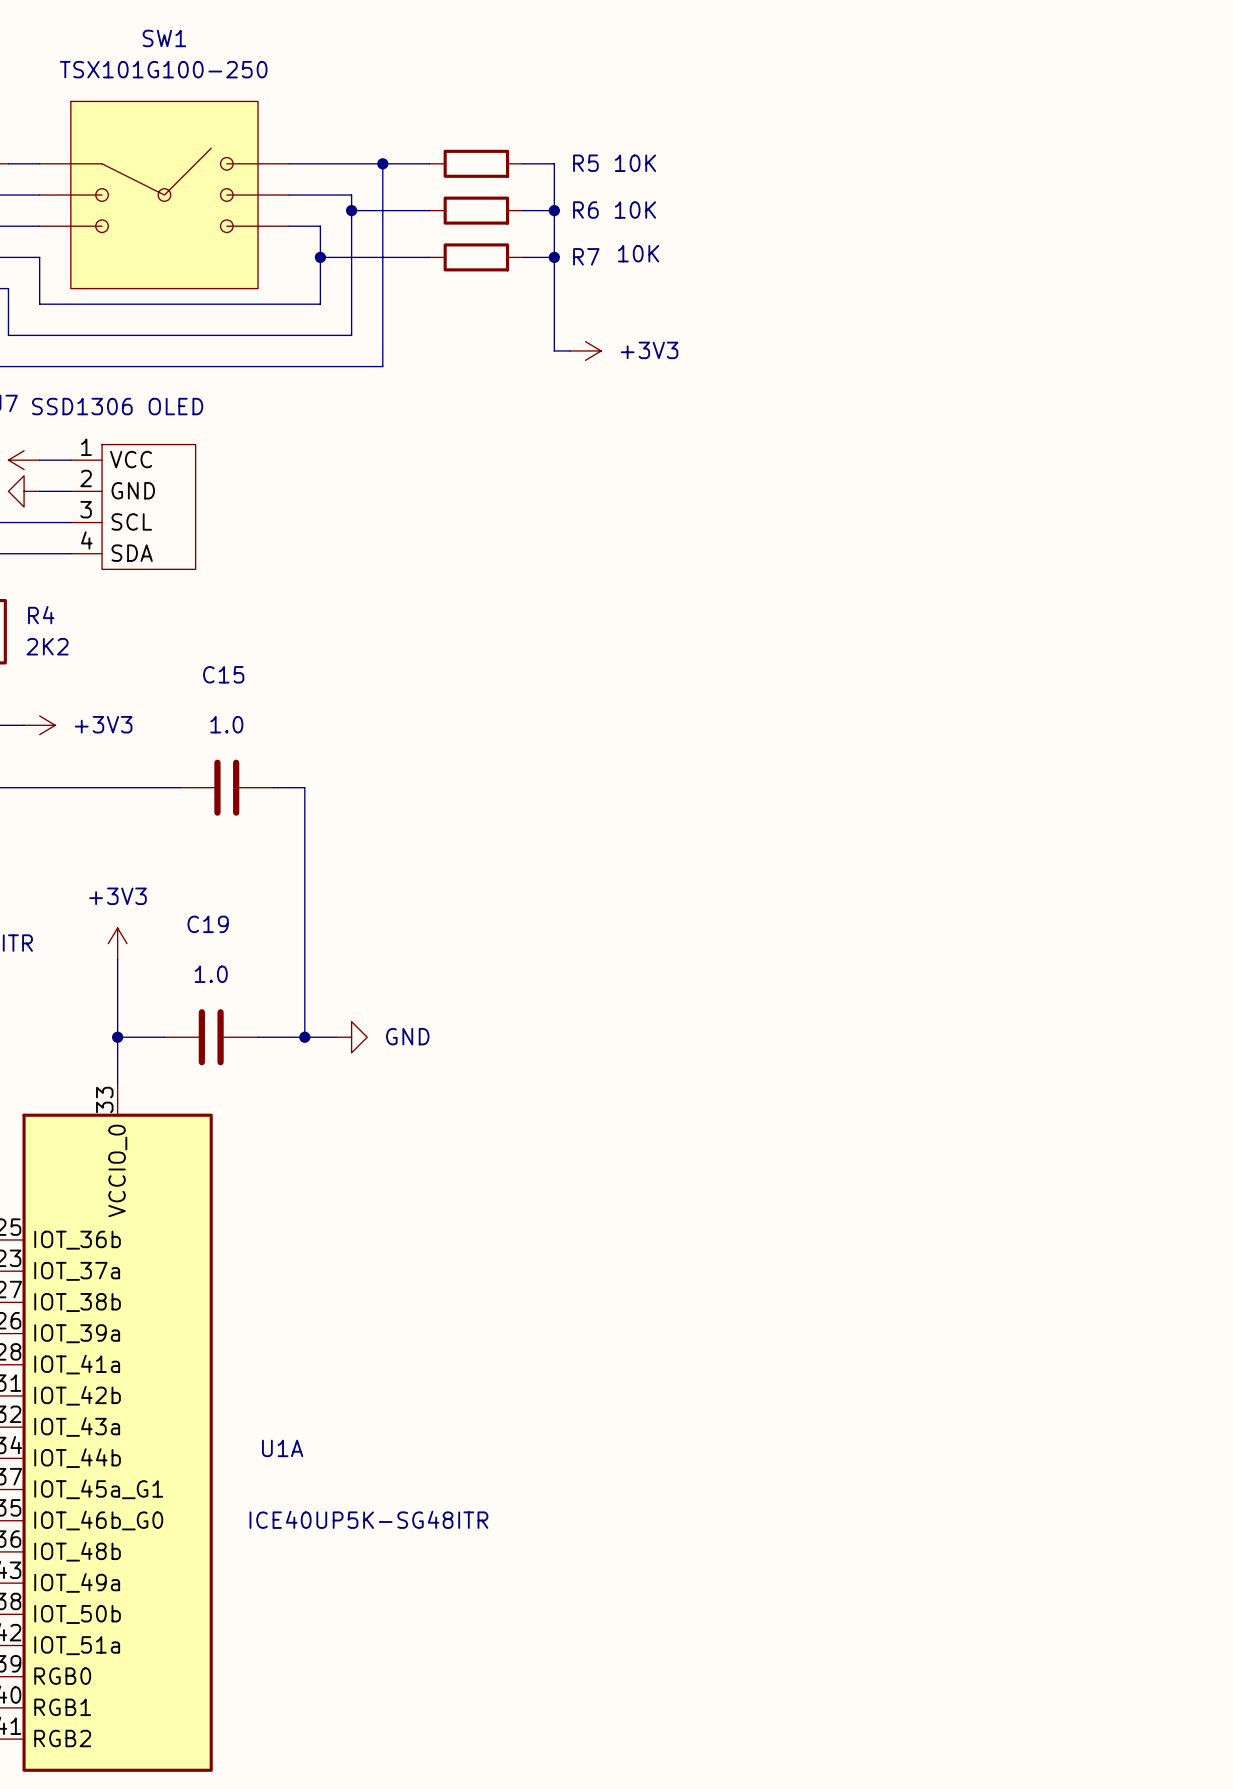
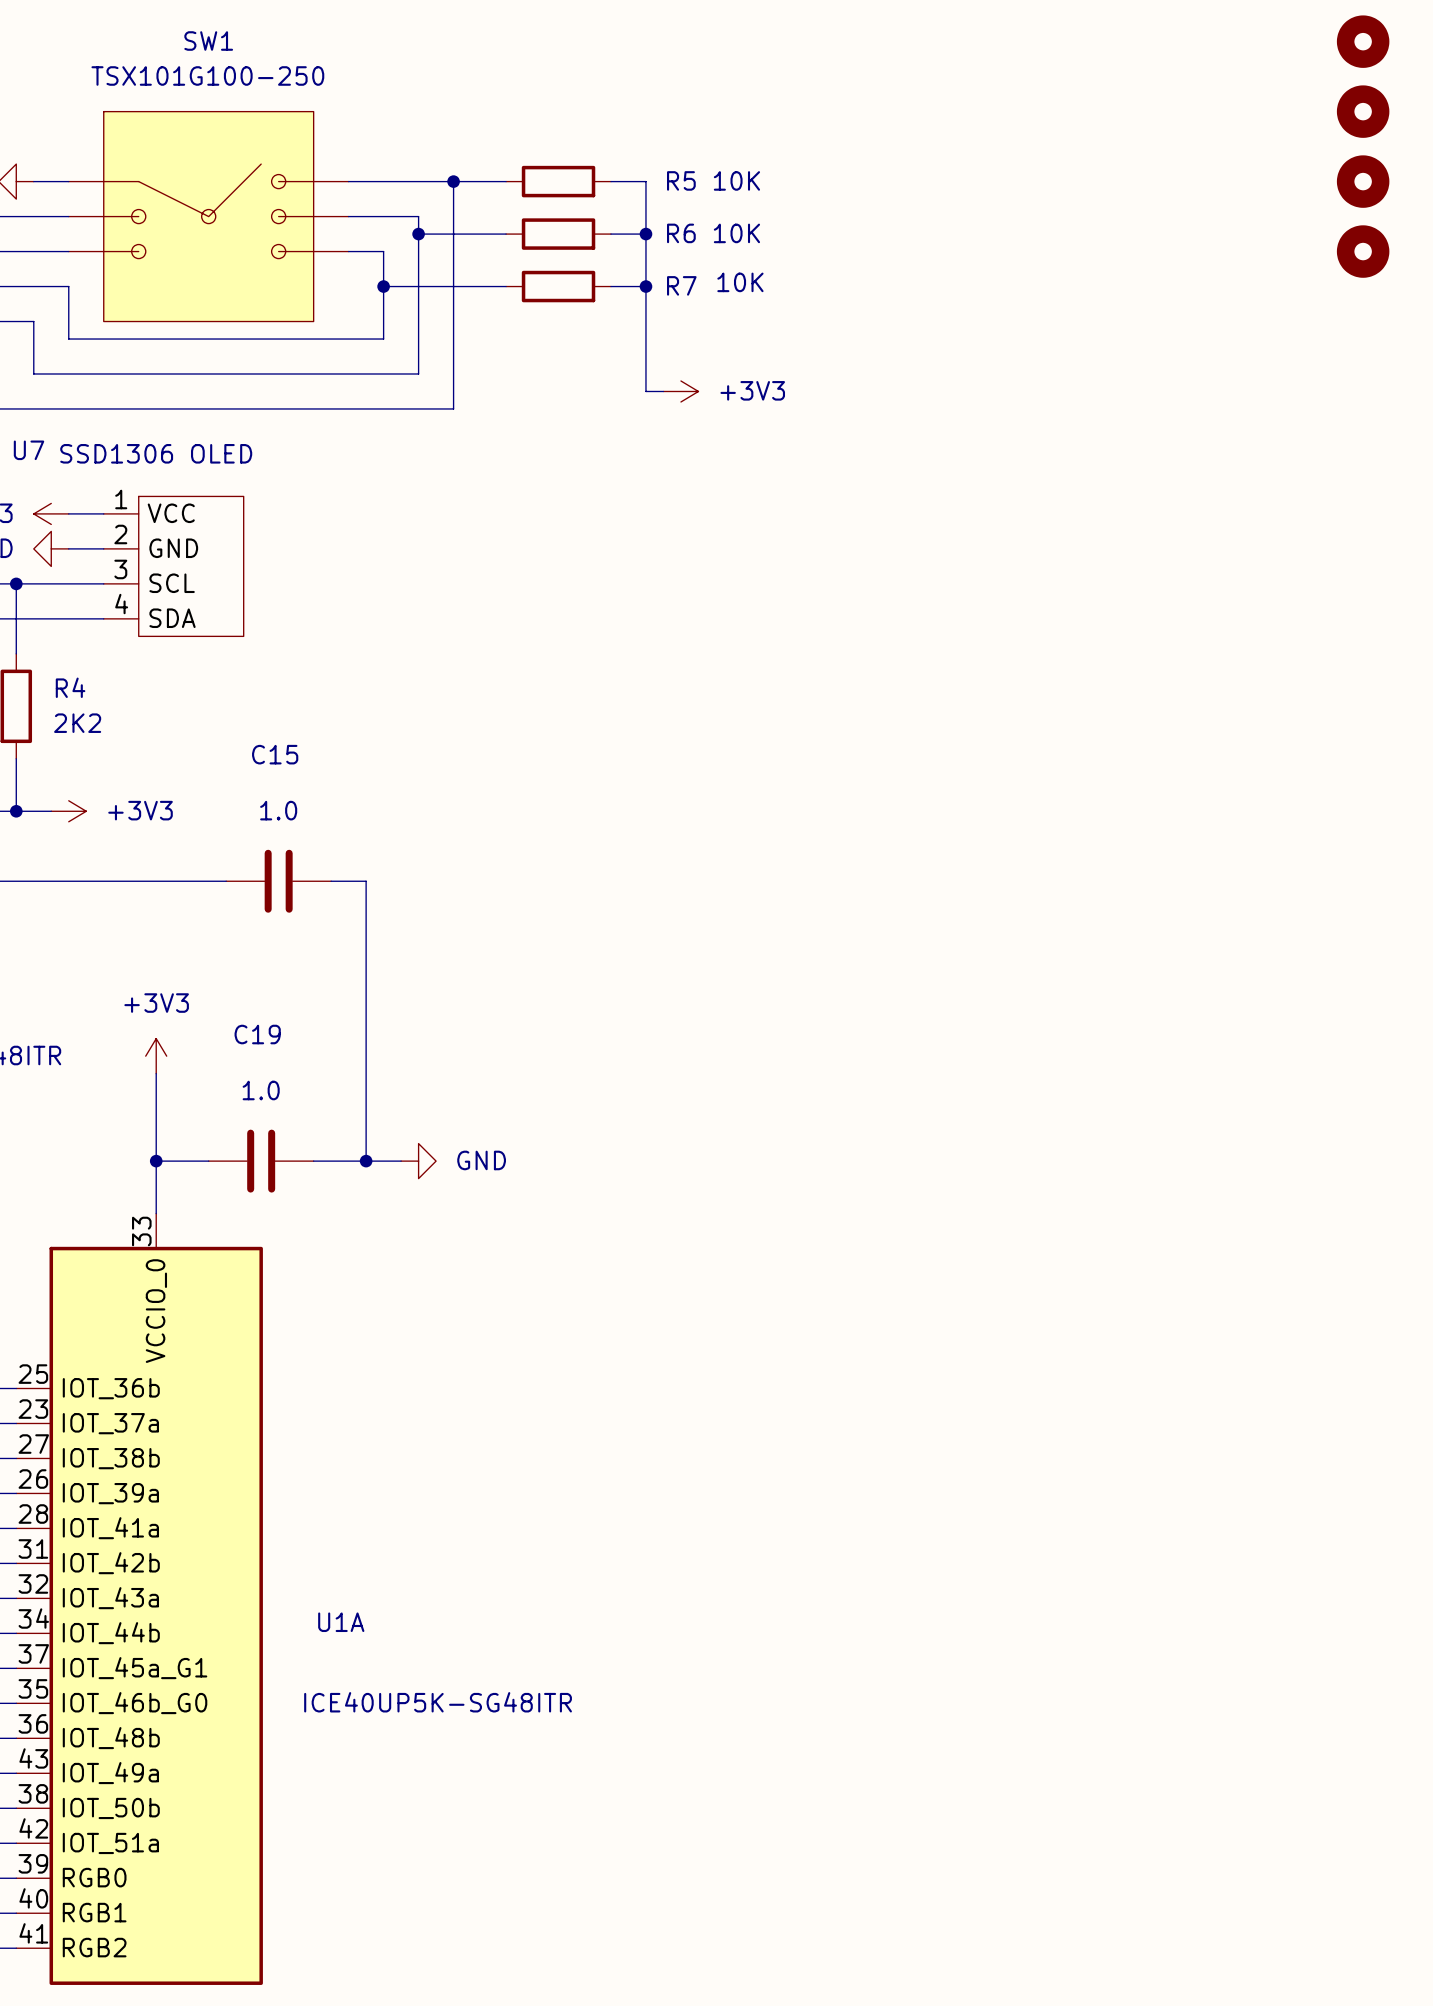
part: none -> (1363, 41)
part: none -> (1363, 111)
part: none -> (1363, 181)
part: none -> (1363, 251)

